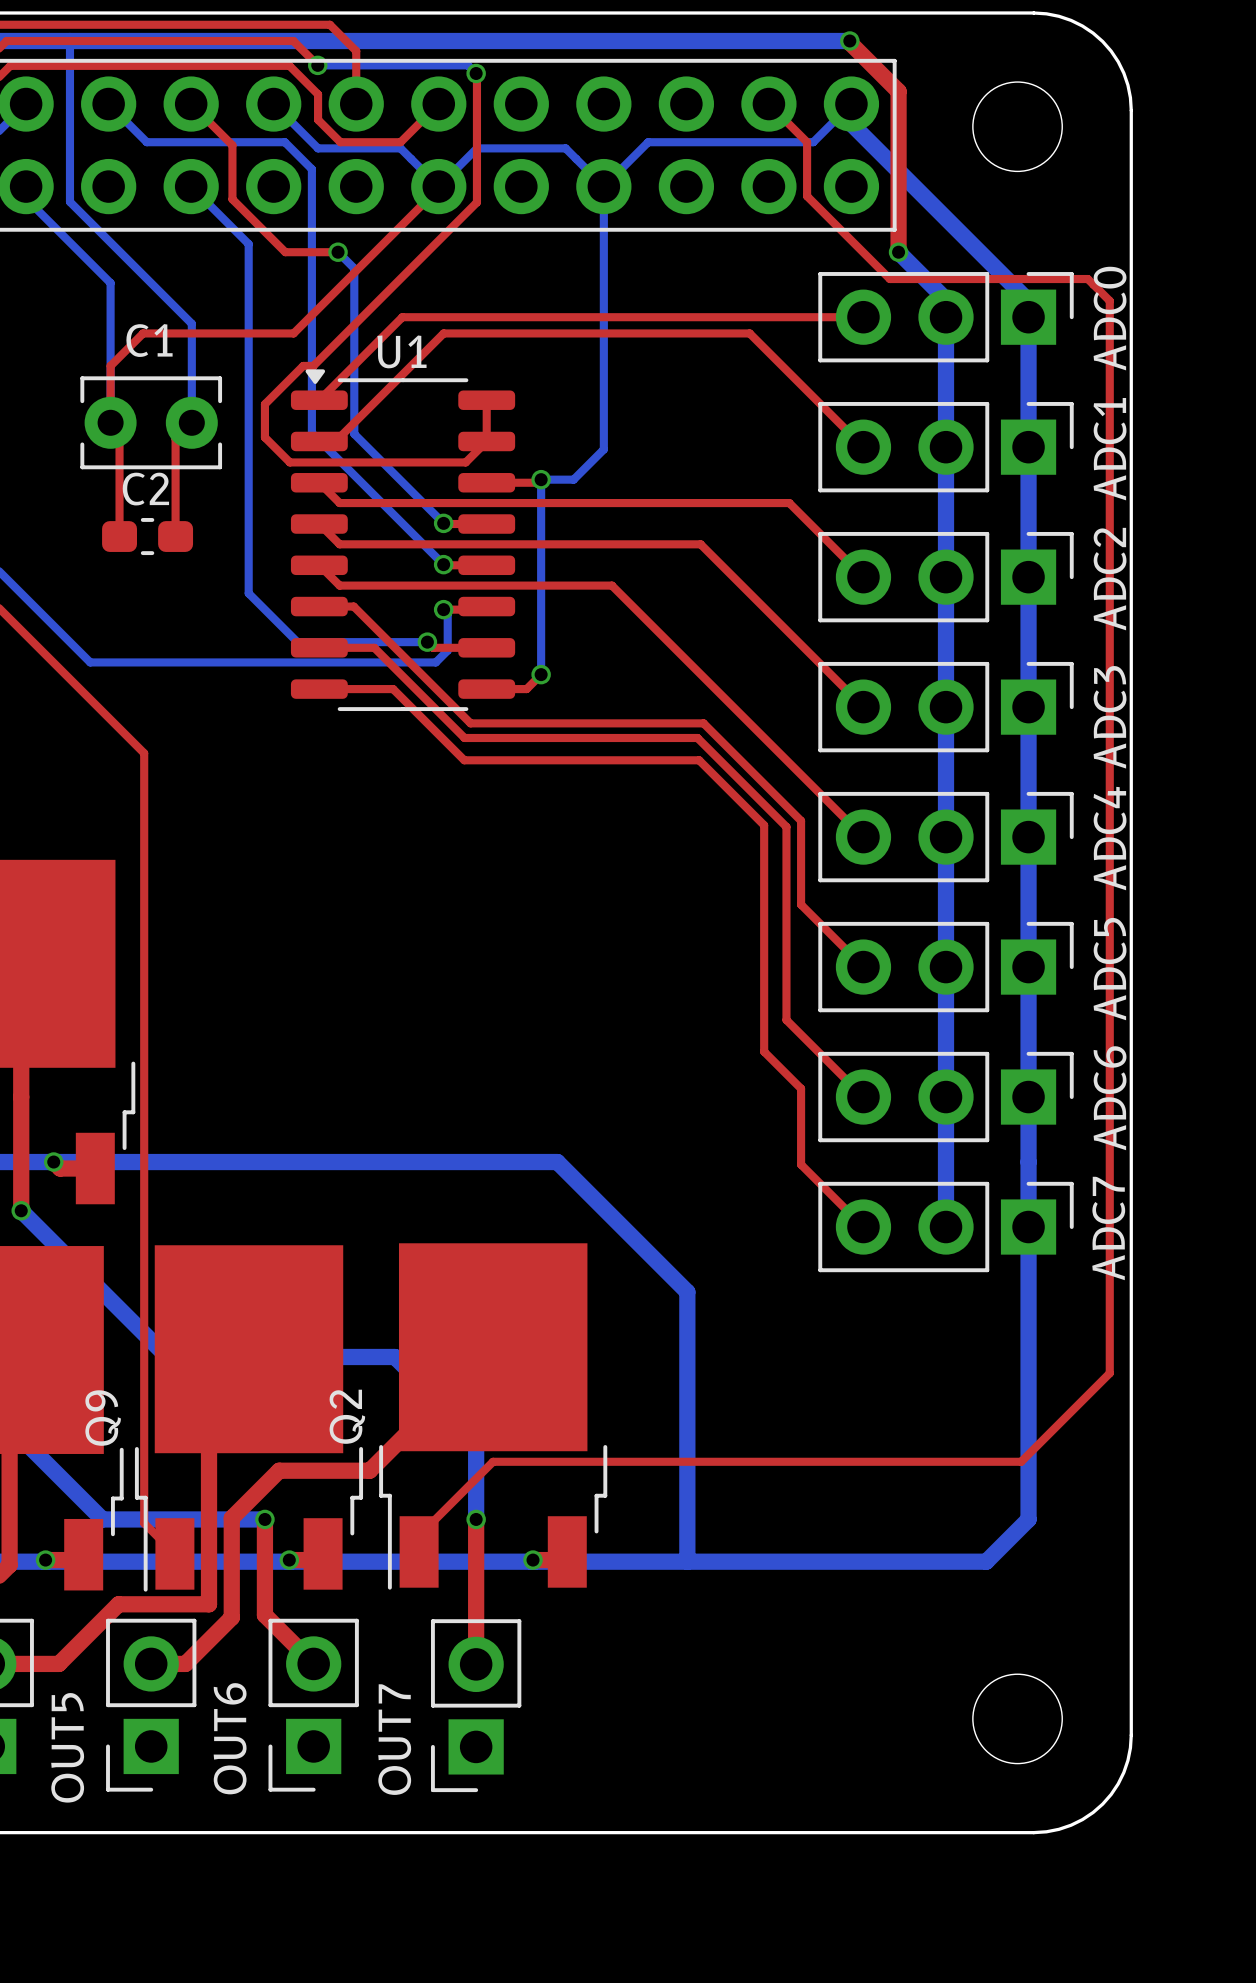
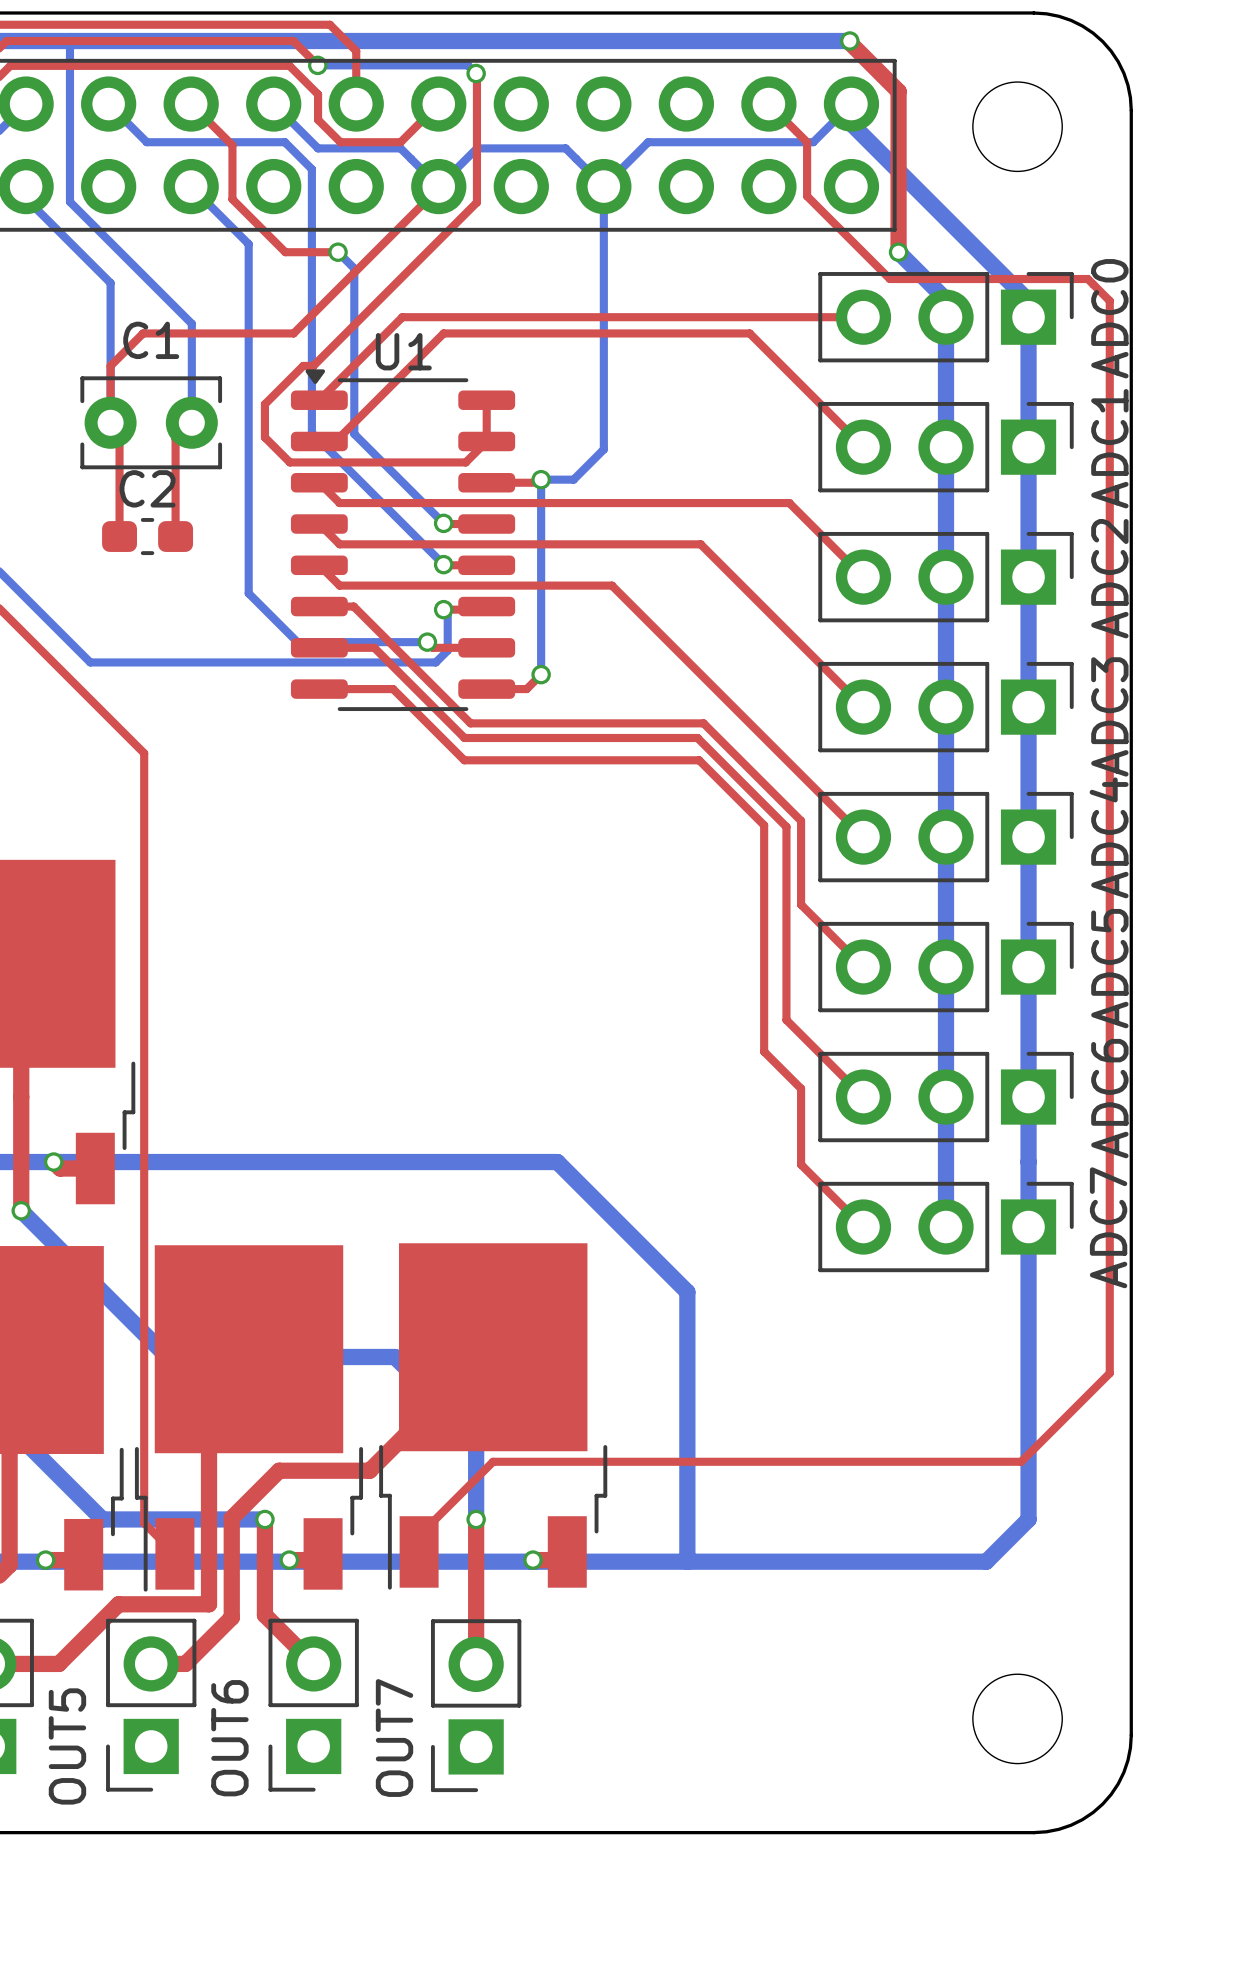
Q2 name: Q2 (347, 1416) -> none
Q9 name: Q9 (103, 1418) -> none

